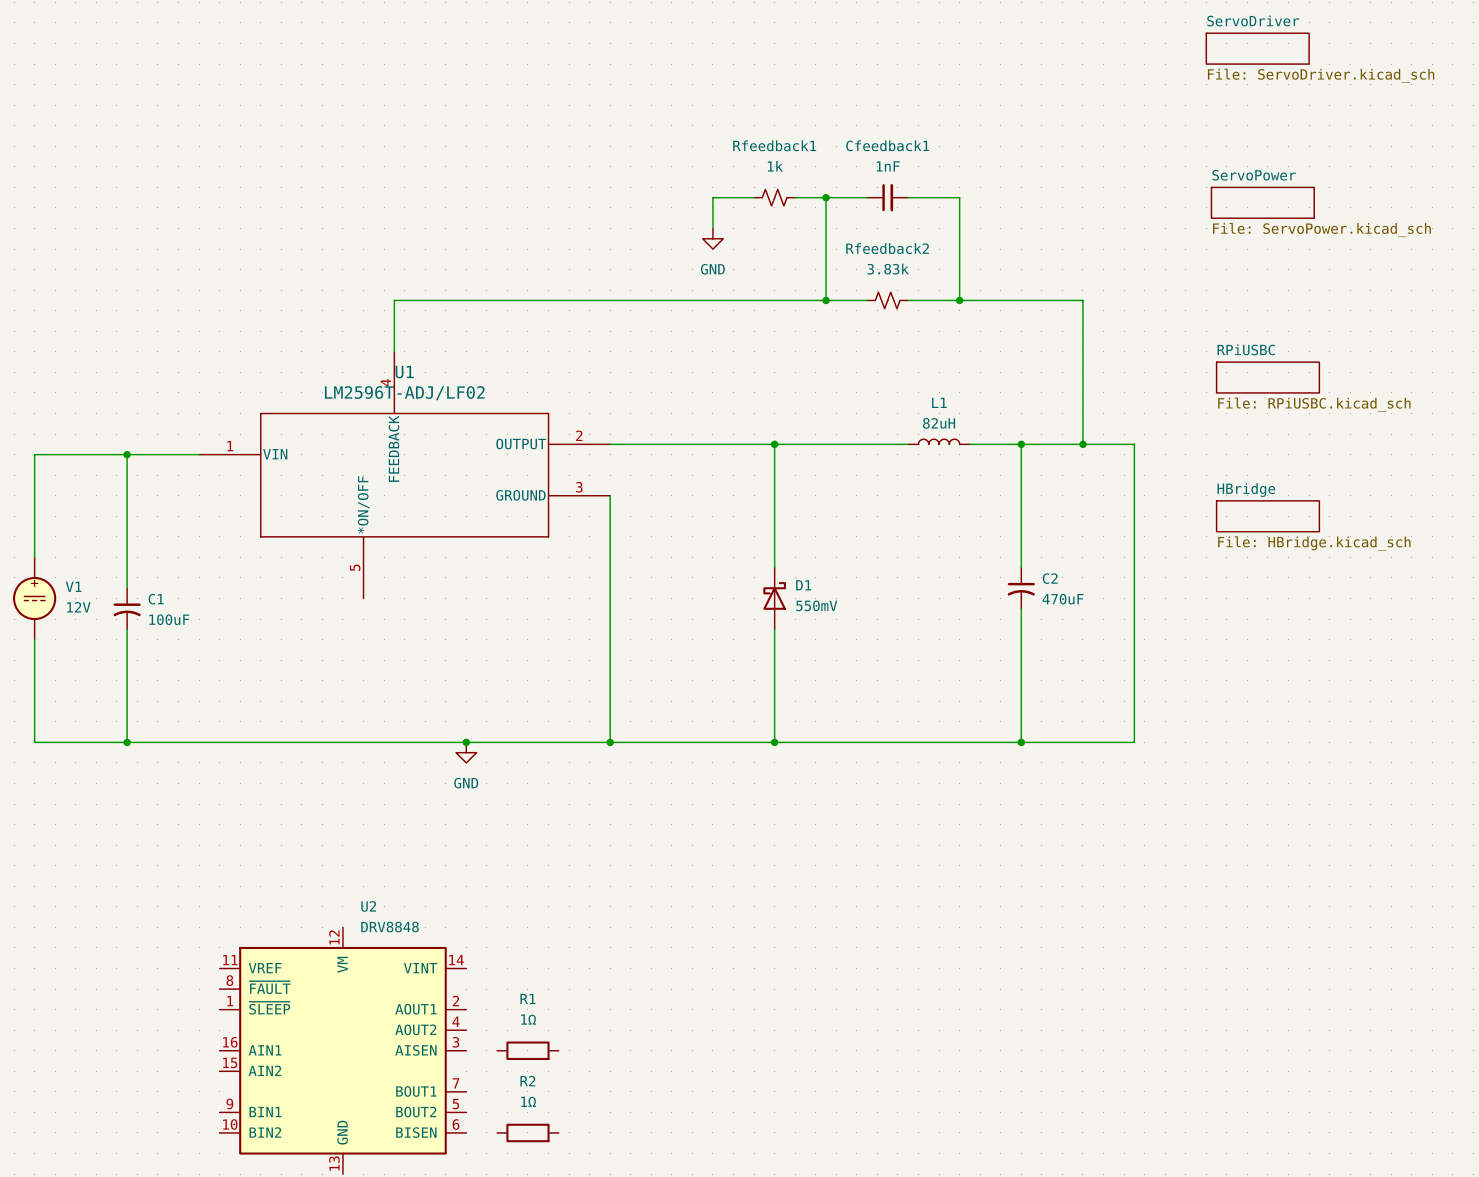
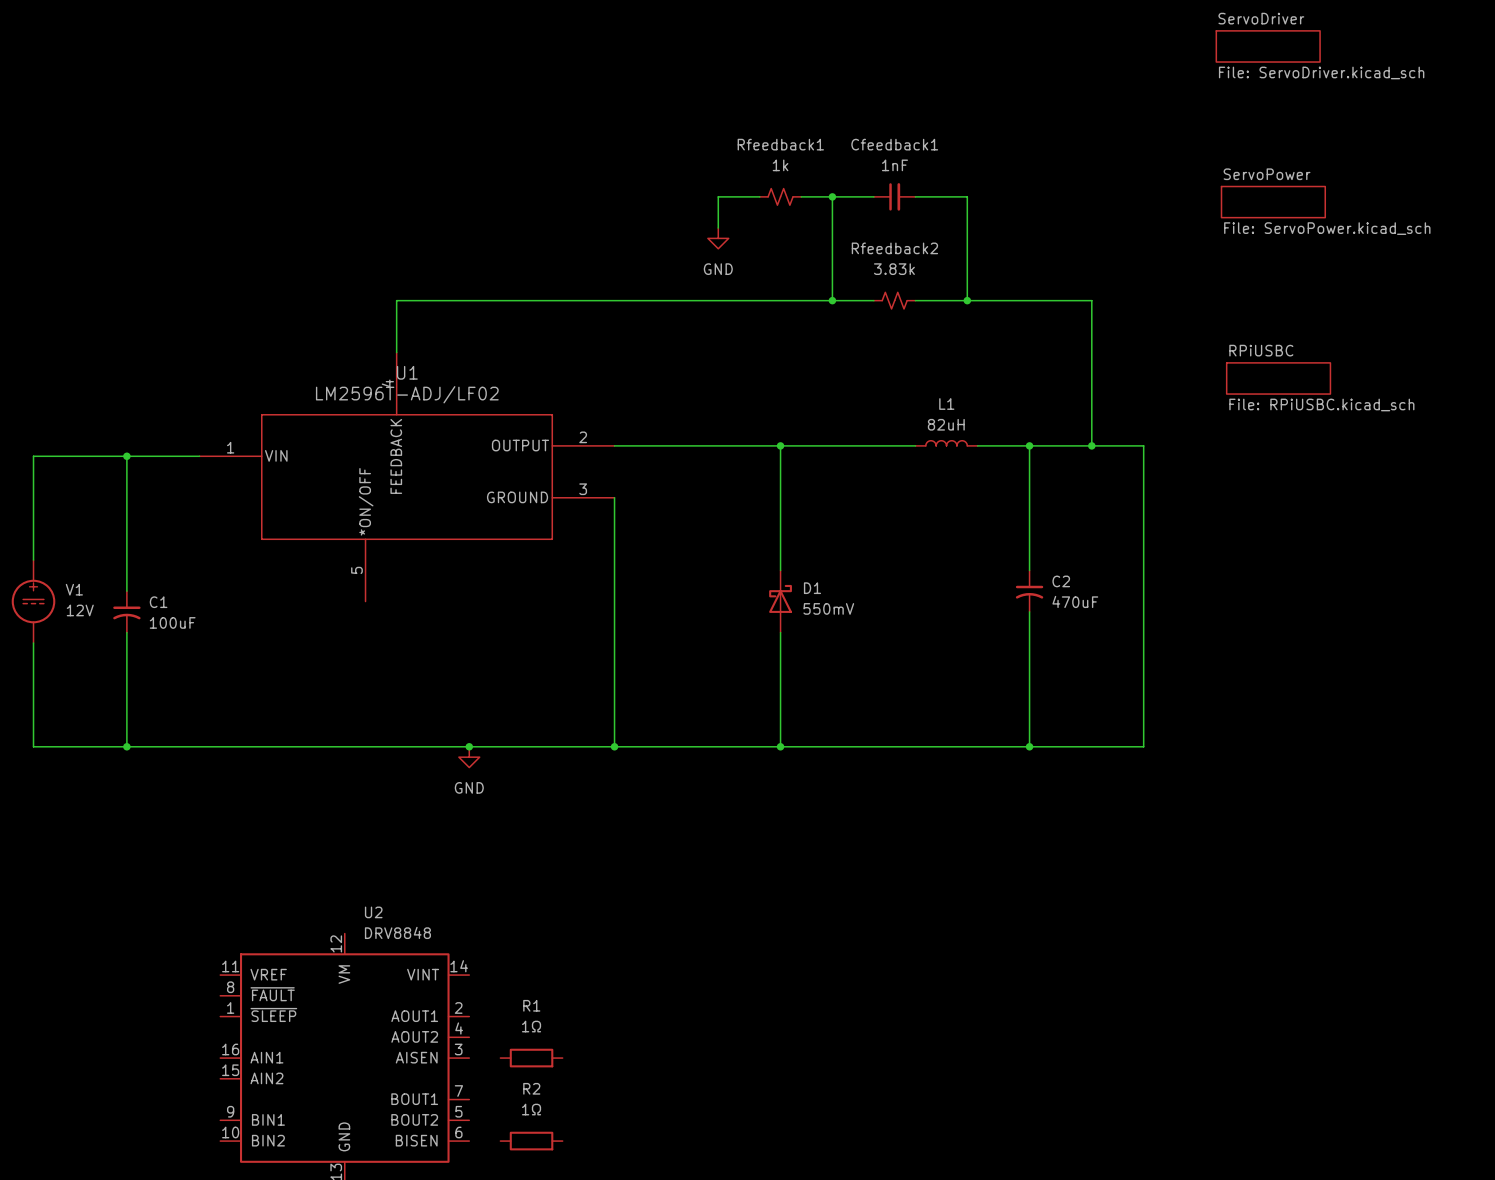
sheet HBridge: File: HBridge.kicad_sch (1267, 516) -> none

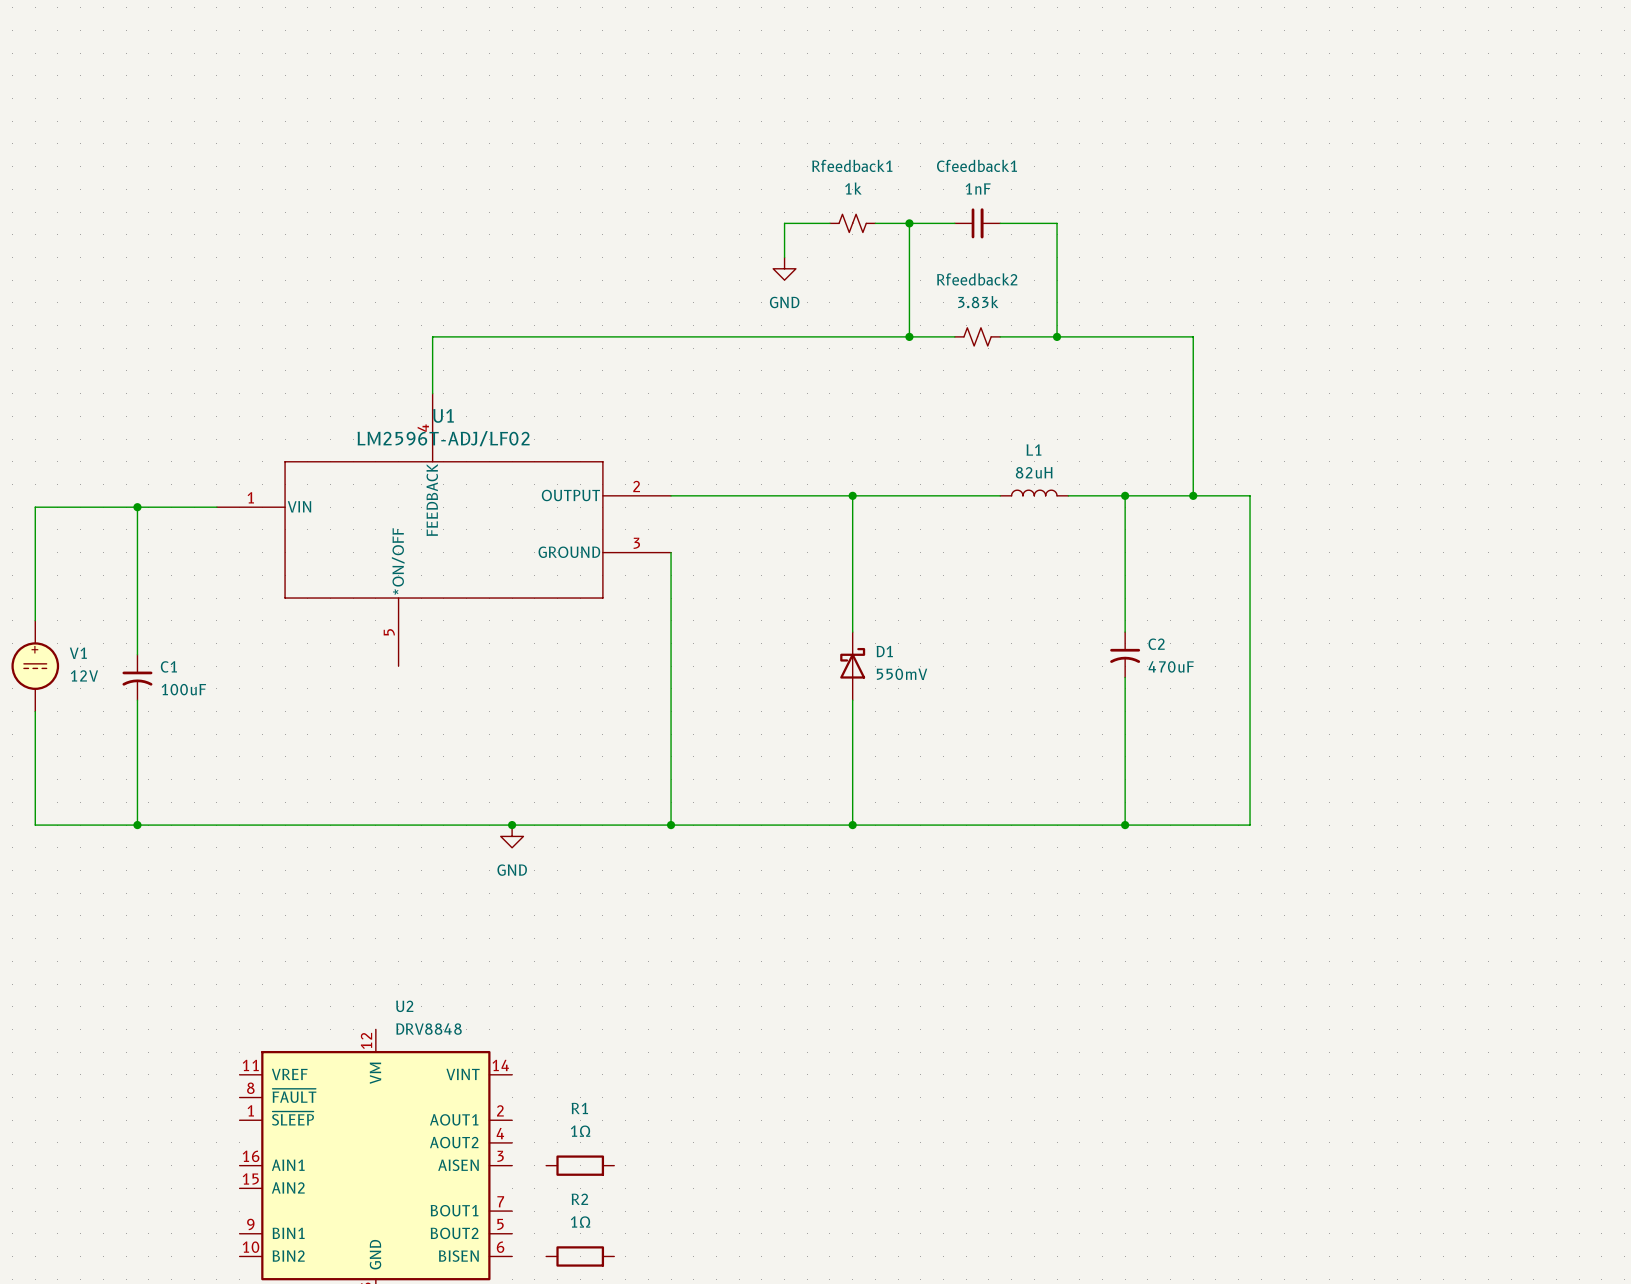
sheet ServoDriver: File: ServoDriver.kicad_sch (1268, 46) -> none
sheet ServoPower: File: ServoPower.kicad_sch (1273, 202) -> none
sheet RPiUSBC: File: RPiUSBC.kicad_sch (1278, 378) -> none

